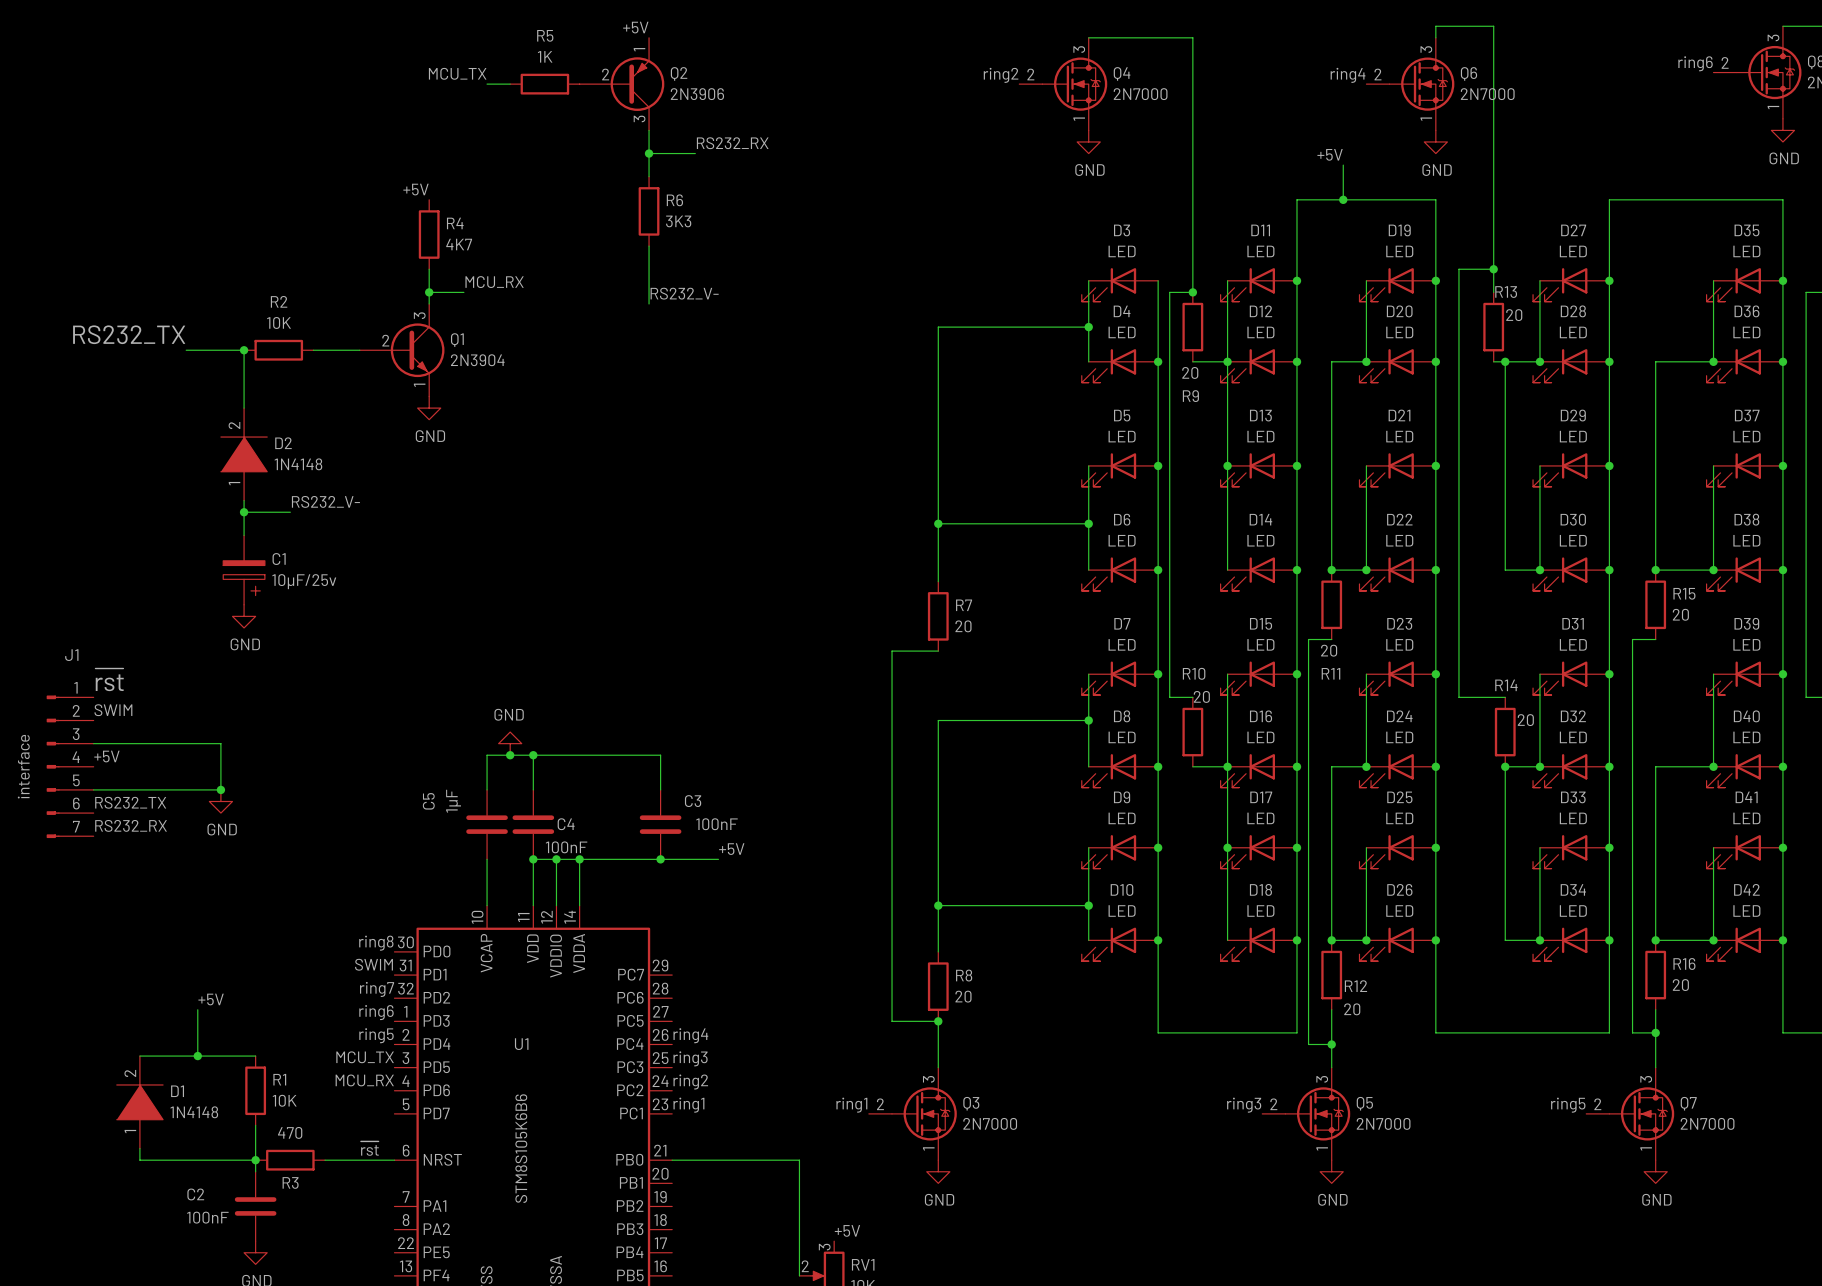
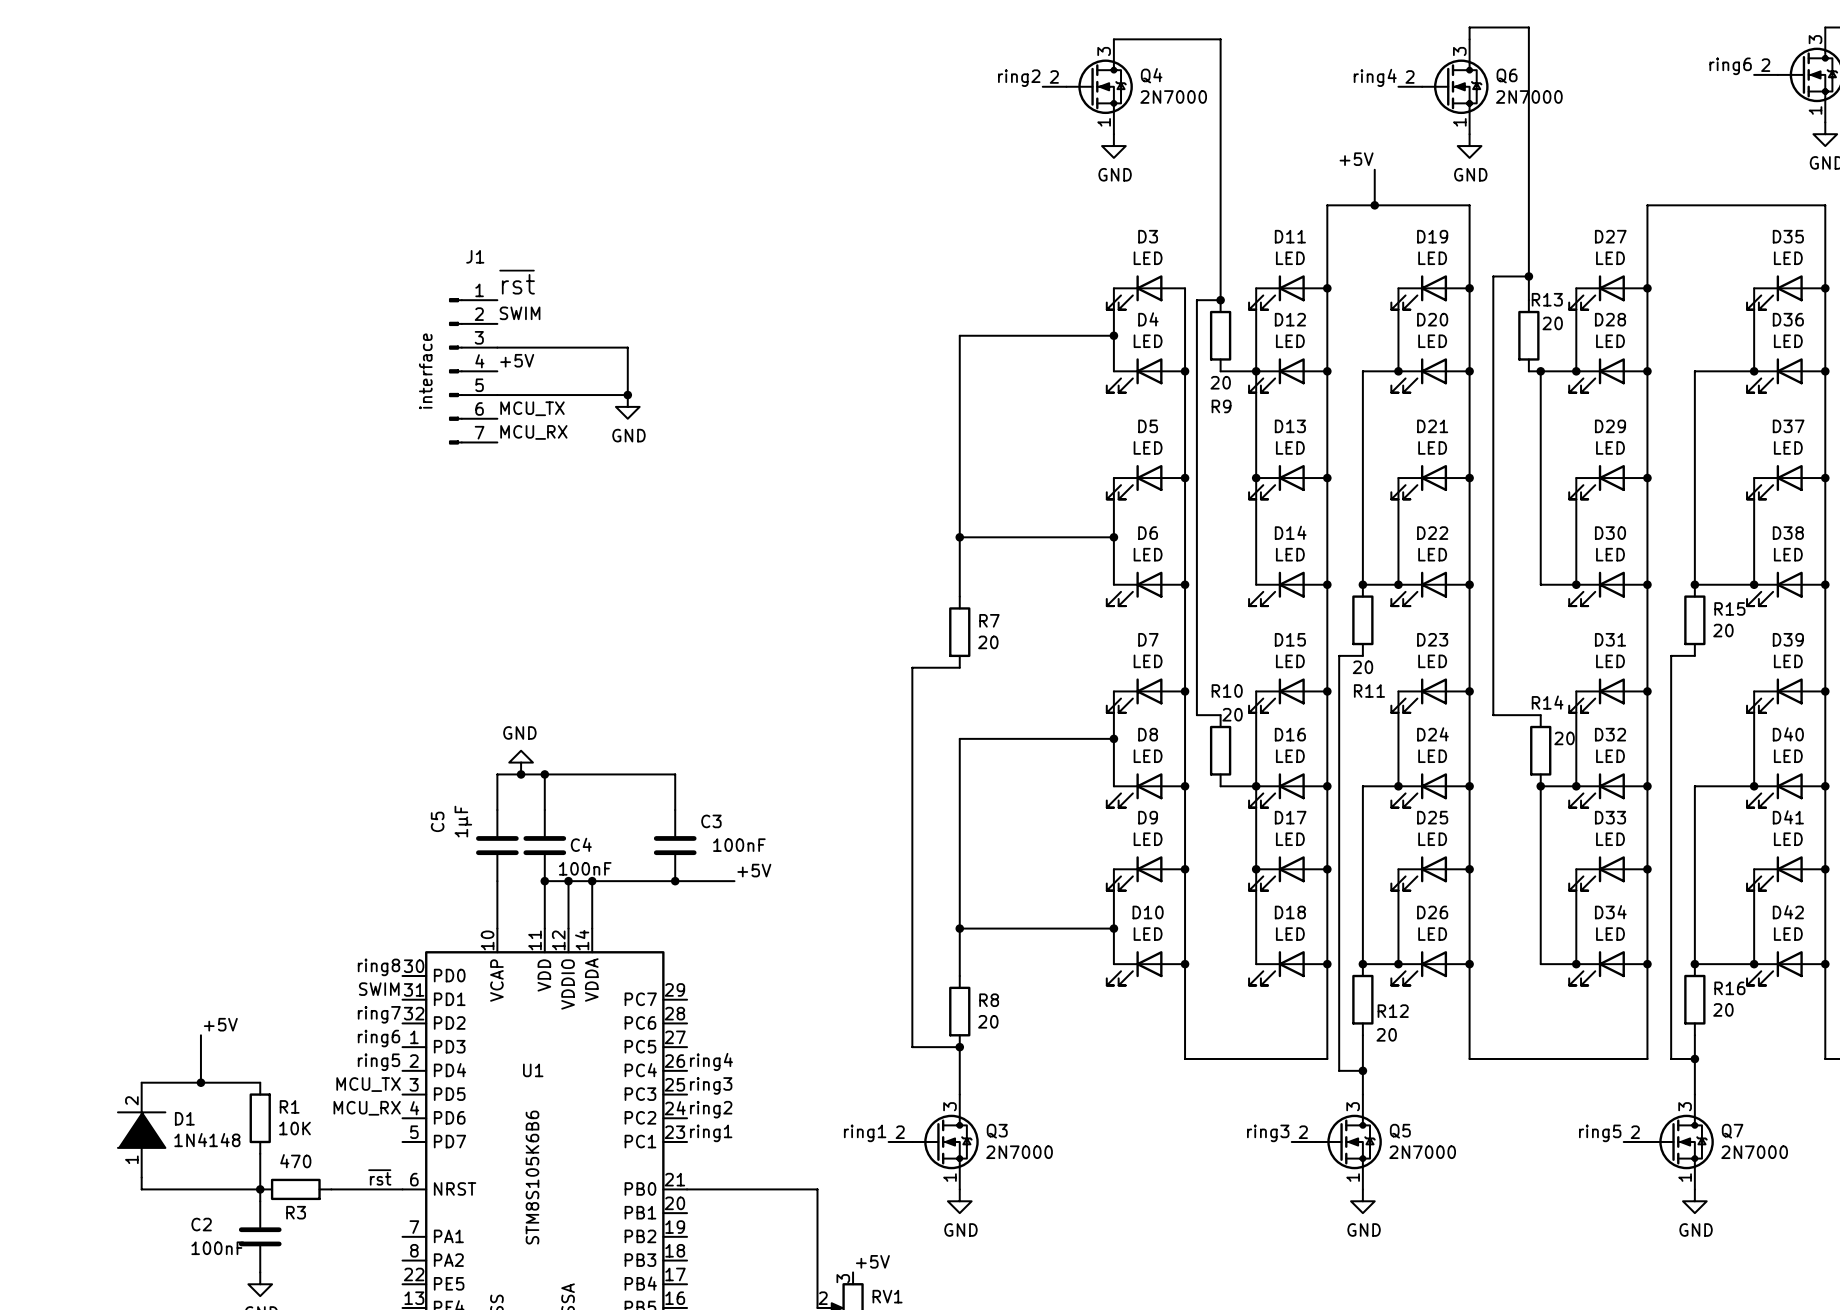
label: +5V (635, 27) -> none
label: MCU_TX (457, 73) -> none
wire: (487, 84) (510, 84) -> none
R5: 1K (544, 84) -> none
Q2: 2N3906 (621, 84) -> none
wire: (649, 130) (649, 176) -> none
label: RS232_RX (732, 143) -> none
wire: (649, 153) (695, 153) -> none
junction: (649, 153) -> none
label position: +5V (415, 189) -> +5V (517, 360)
R6: 3K3 (649, 211) -> none
R4: 4K7 (429, 234) -> none
wire: (649, 246) (649, 303) -> none
wire: (429, 269) (429, 303) -> none
label: none -> ~{rst} (517, 282)
label position: MCU_RX (494, 282) -> MCU_RX (533, 432)
junction: (429, 292) -> none
label: RS232_V- (684, 293) -> none
label: none -> SWIM (520, 313)
label: RS232_TX (129, 334) -> none
wire: none -> (497, 347) (627, 347) (627, 395) (497, 395)
wire: (186, 350) (244, 350) (244, 408) -> none
junction: (244, 350) -> none
R2: 10K (278, 350) -> none
wire: (313, 350) (359, 350) -> none
Q1: 2N3904 (402, 350) -> none
junction: none -> (627, 395)
label: none -> MCU_TX (532, 408)
power symbol position: GND (429, 408) -> GND (627, 406)
D2: 1N4148 (244, 454) -> none
wire: (244, 500) (244, 535) -> none
label: RS232_V- (325, 501) -> none
wire: (244, 512) (290, 512) -> none
junction: (244, 512) -> none
C1: 10µF/25v (244, 570) -> none
power symbol: GND (244, 616) -> none
label: ~{rst} (109, 679) -> none
label: SWIM (113, 710) -> none
wire: (93, 743) (220, 743) (220, 789) (93, 789) -> none
label: +5V (106, 756) -> none
J1 position: (70, 766) -> (473, 371)
junction: (220, 789) -> none
power symbol: GND (220, 801) -> none
label: RS232_TX (130, 802) -> none
label: RS232_RX (131, 825) -> none

